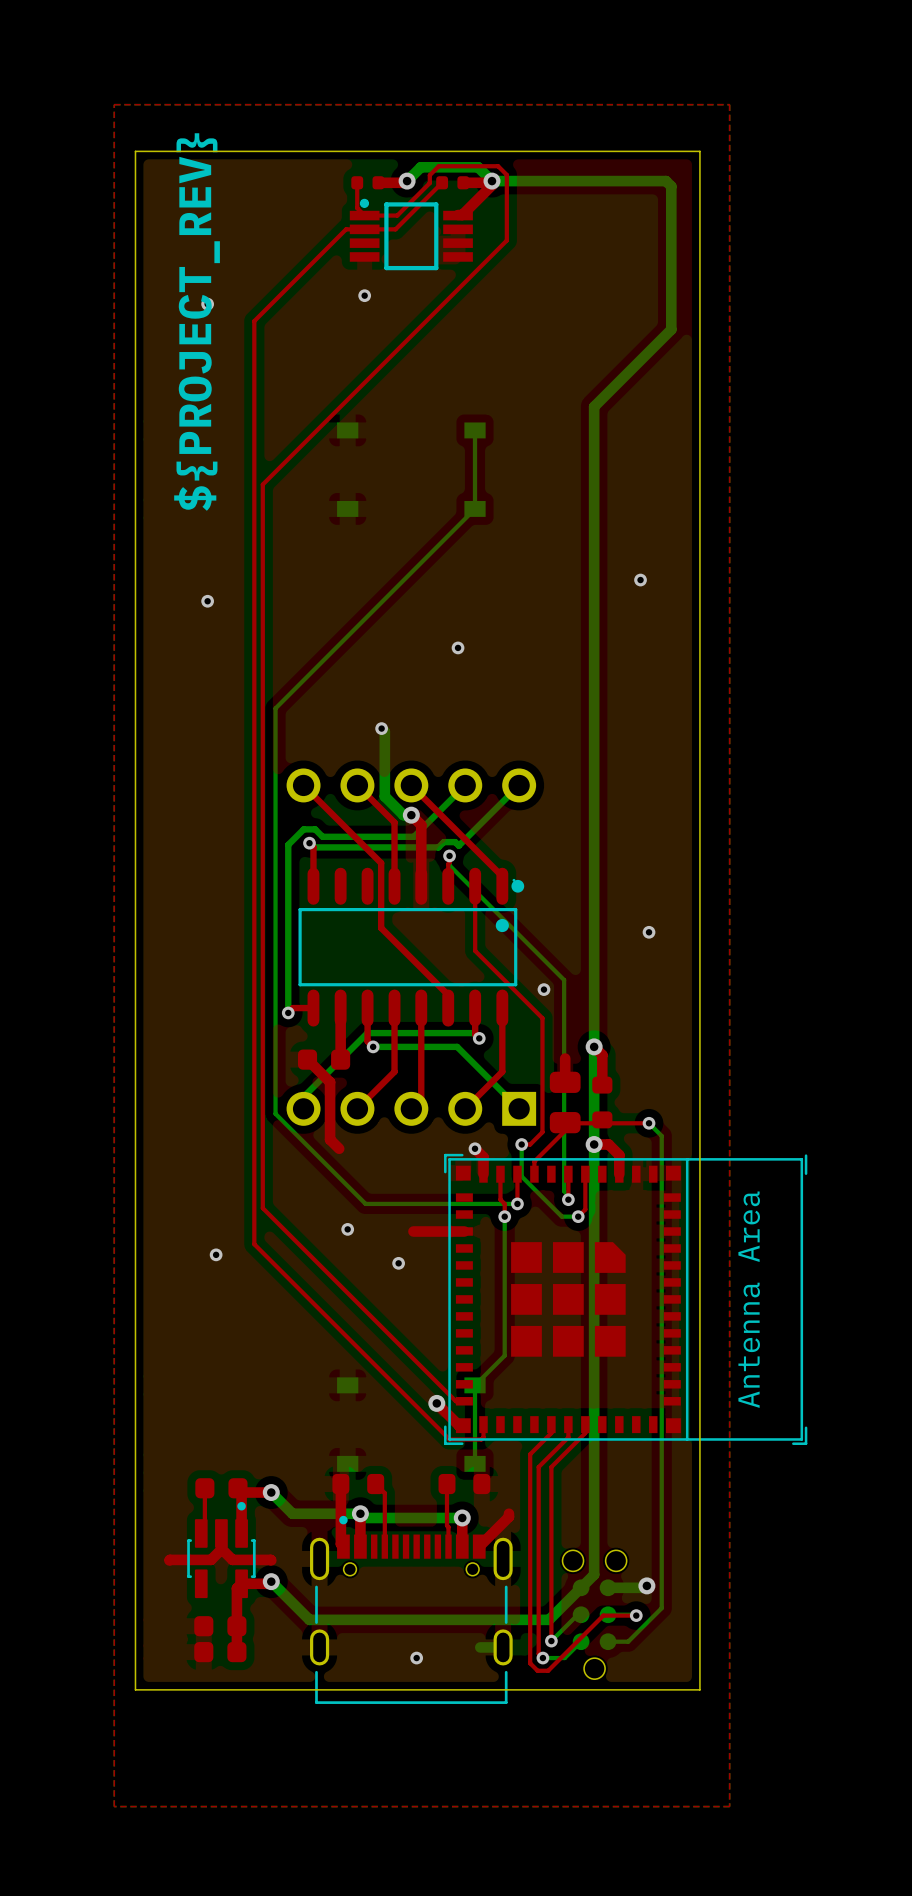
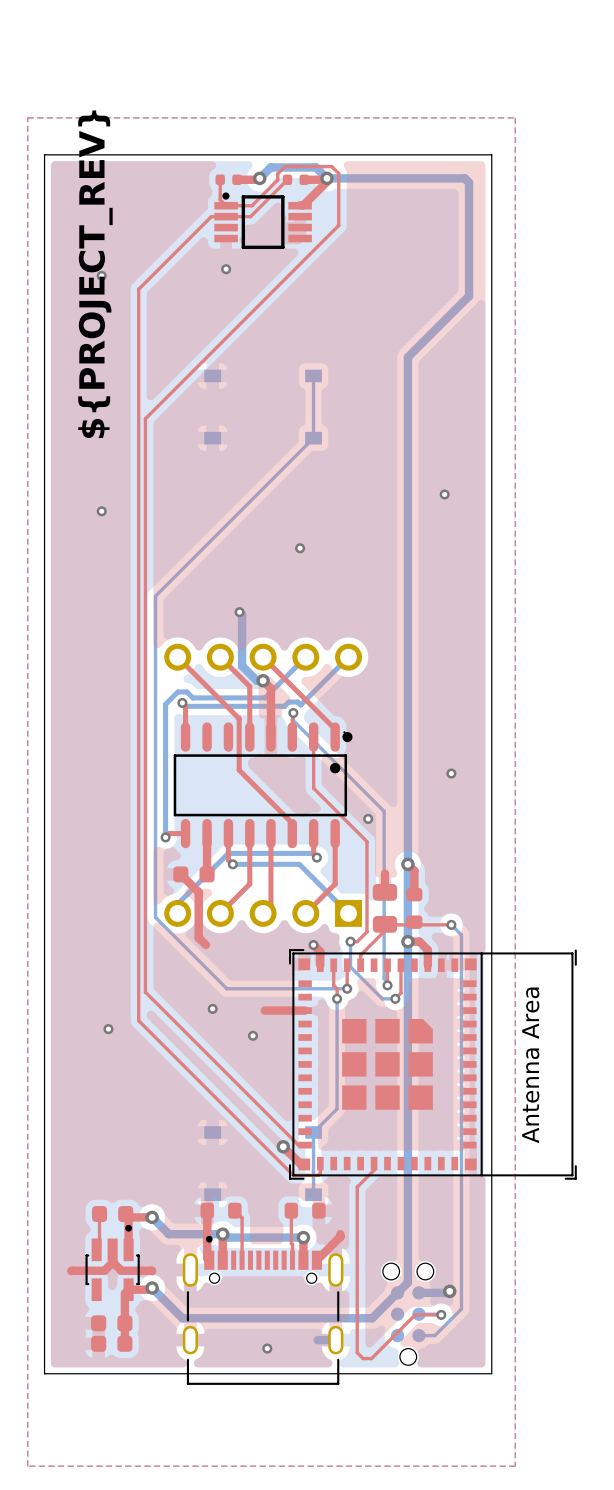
top track: (568, 1424) (568, 1437) (538, 1467) (538, 1653) (542, 1658) -> none
top track: (585, 1424) (585, 1433) (551, 1467) (551, 1641) -> none
bottom track: (581, 1614) (577, 1614) (551, 1641) -> none
via: (551, 1641) -> none
bottom track: (581, 1641) (564, 1658) (542, 1658) -> none
via: (542, 1658) -> none

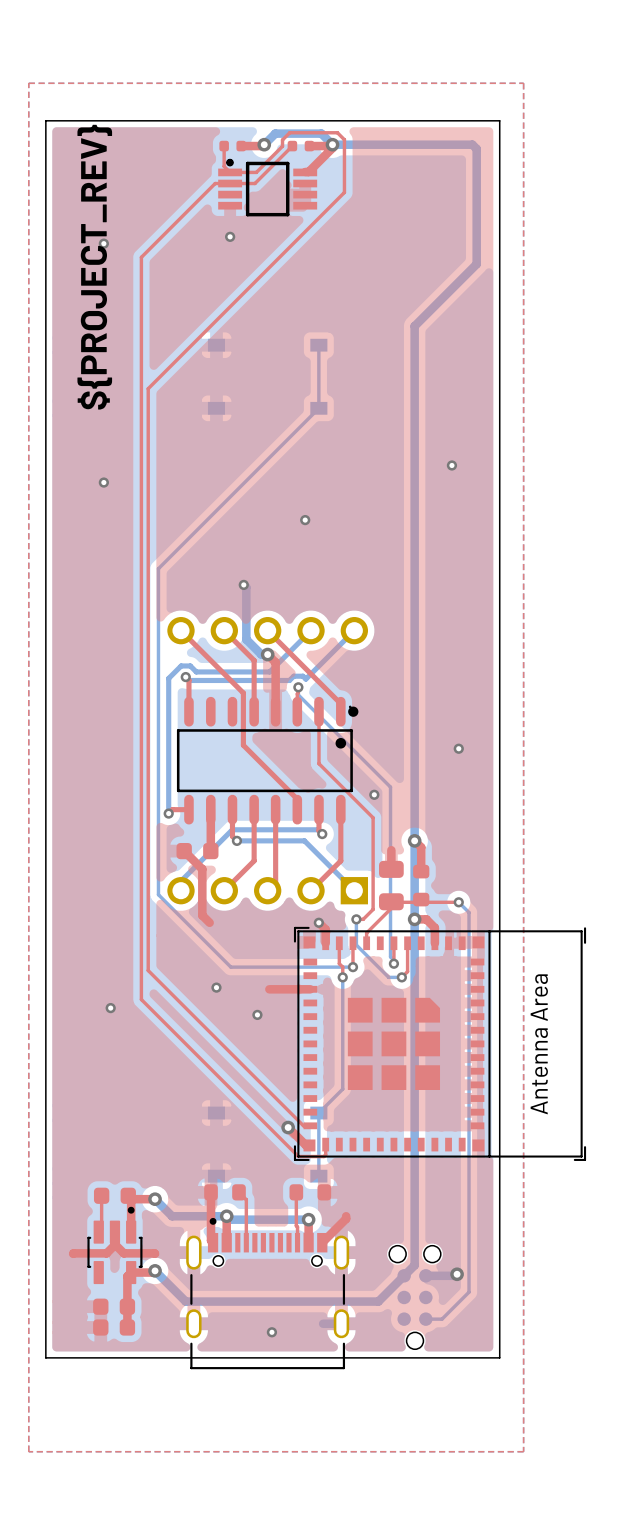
top track: (374, 1163) (374, 1170) (357, 1187) (357, 1352) (363, 1358) (371, 1358) (415, 1314) (441, 1314) -> none
via: (441, 1314) -> none

